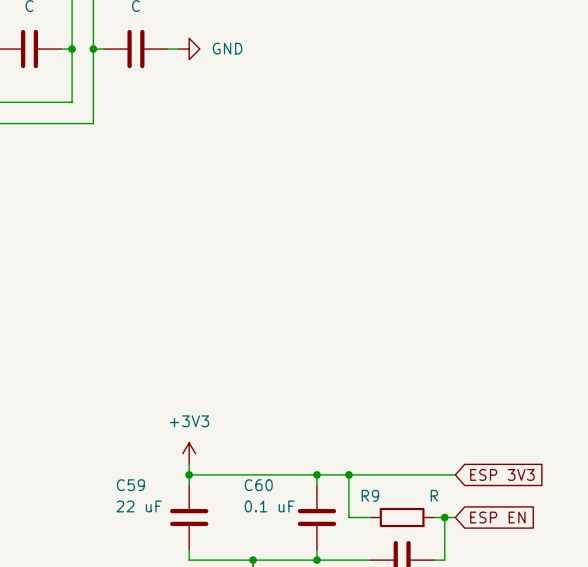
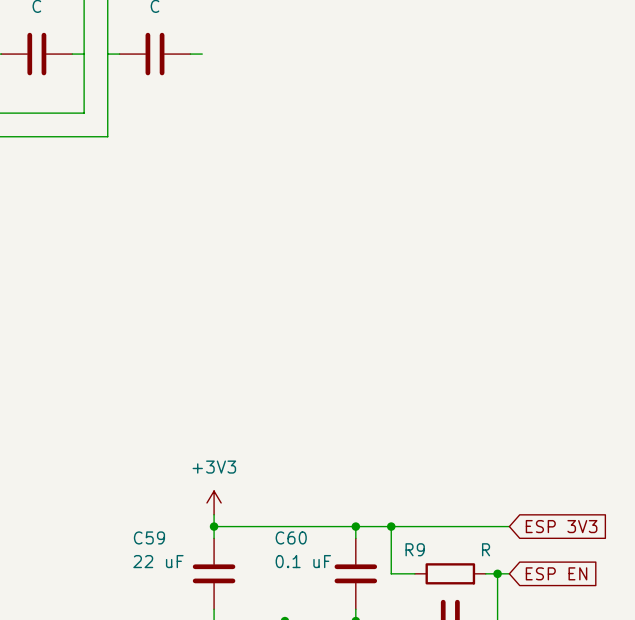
junction: (72, 49) -> none
junction: (93, 49) -> none
power symbol: GND (189, 49) -> none

